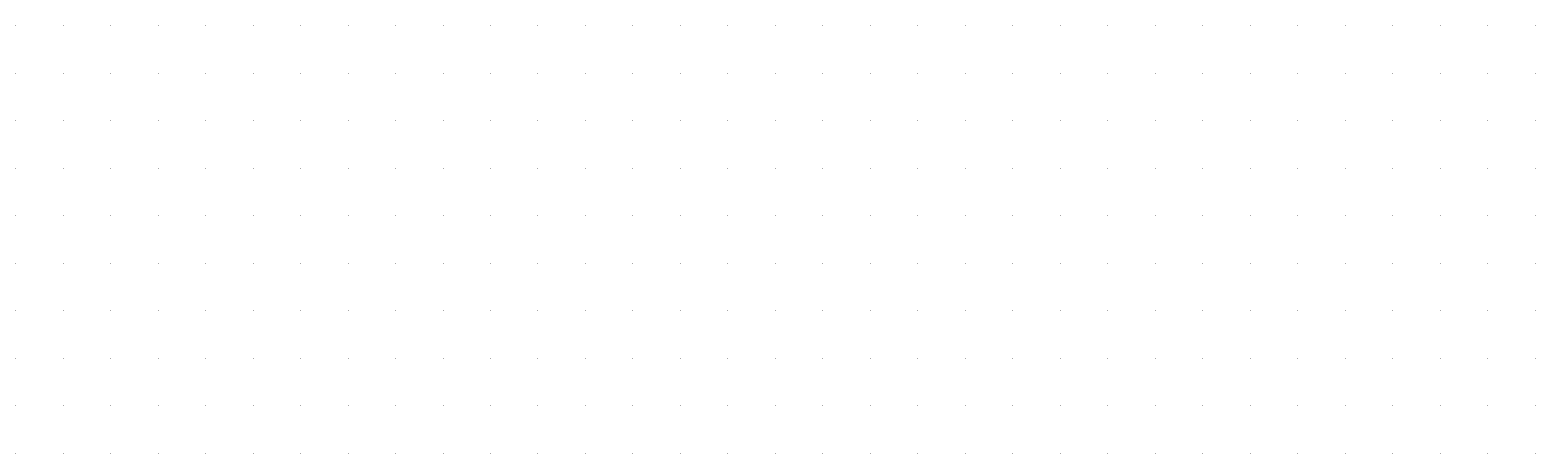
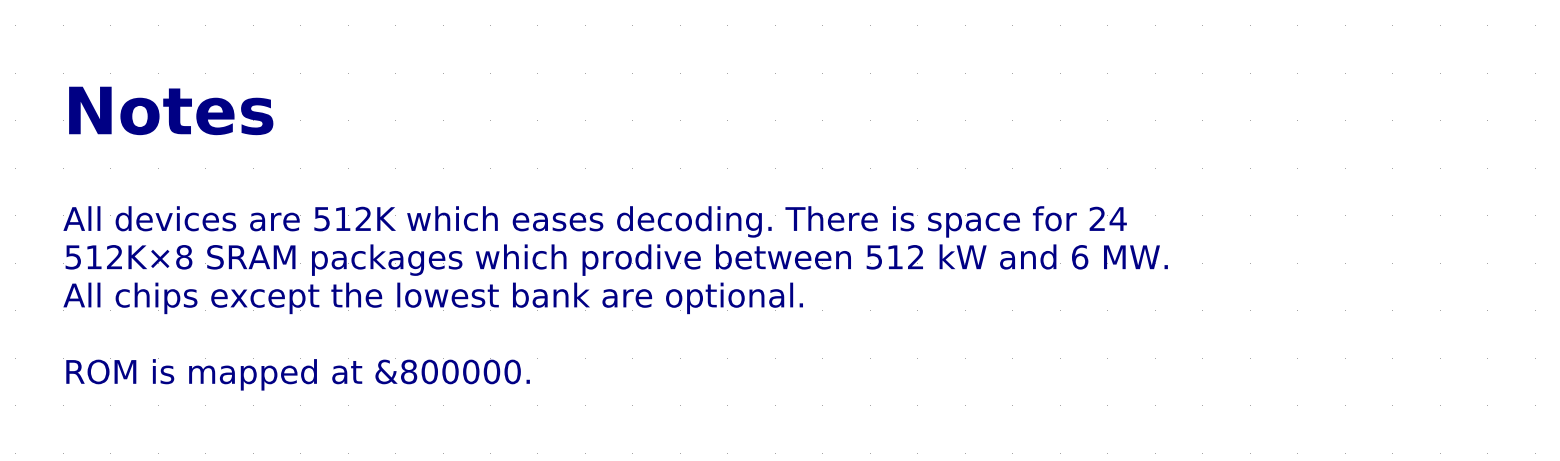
text: none -> Notes (171, 110)
text: none -> All devices are 512K which eases decoding. There is space for 24 (595, 221)
text: none -> 512K×8 SRAM packages which prodive between 512 kW and 6 MW. (616, 260)
text: none -> All chips except the lowest bank are optional. (433, 298)
text: none -> ROM is mapped at &800000. (298, 374)

